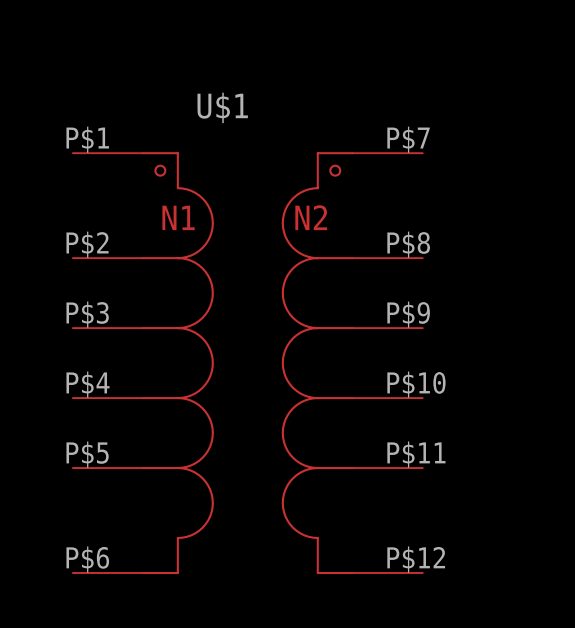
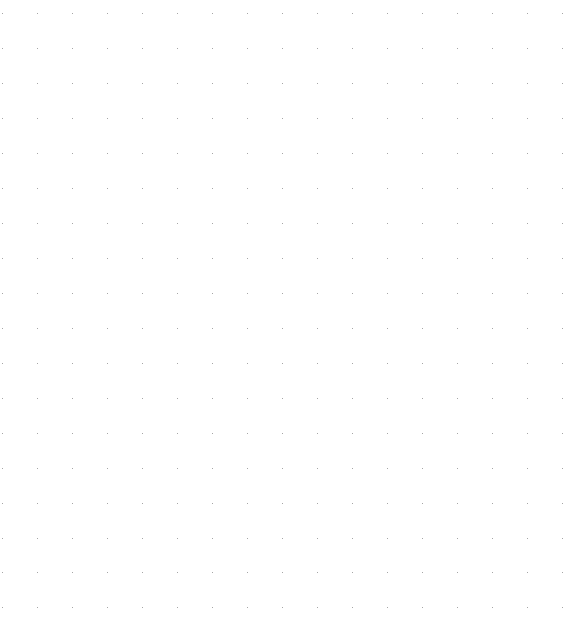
U$1: (247, 363) -> none

